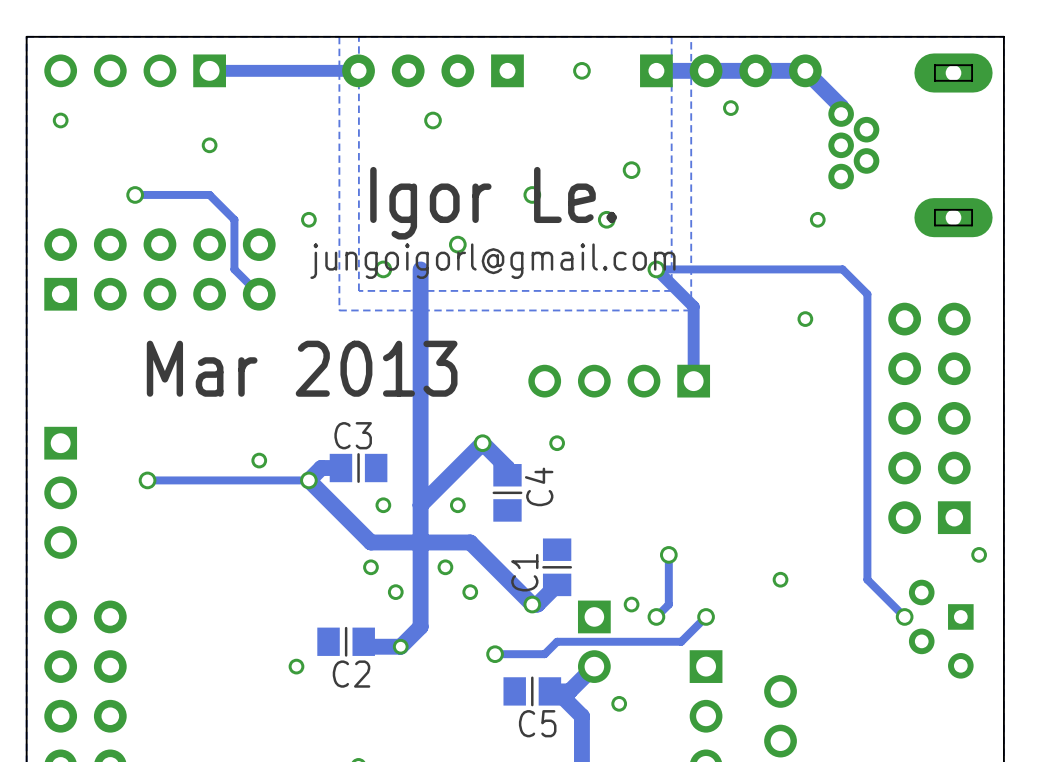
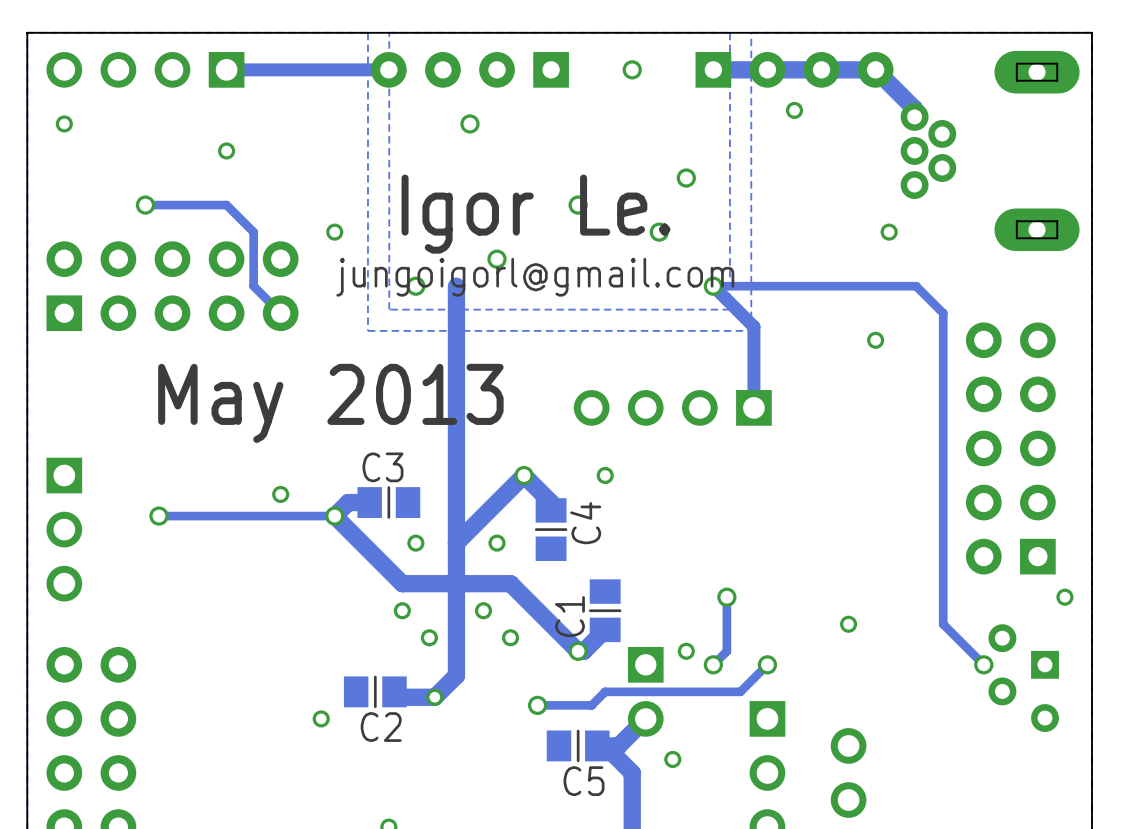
text: Mar 2013 (302, 368) -> May 2013 (330, 403)

